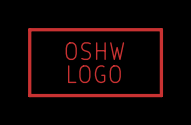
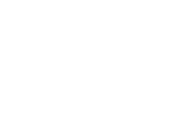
part: (95, 62) -> none

